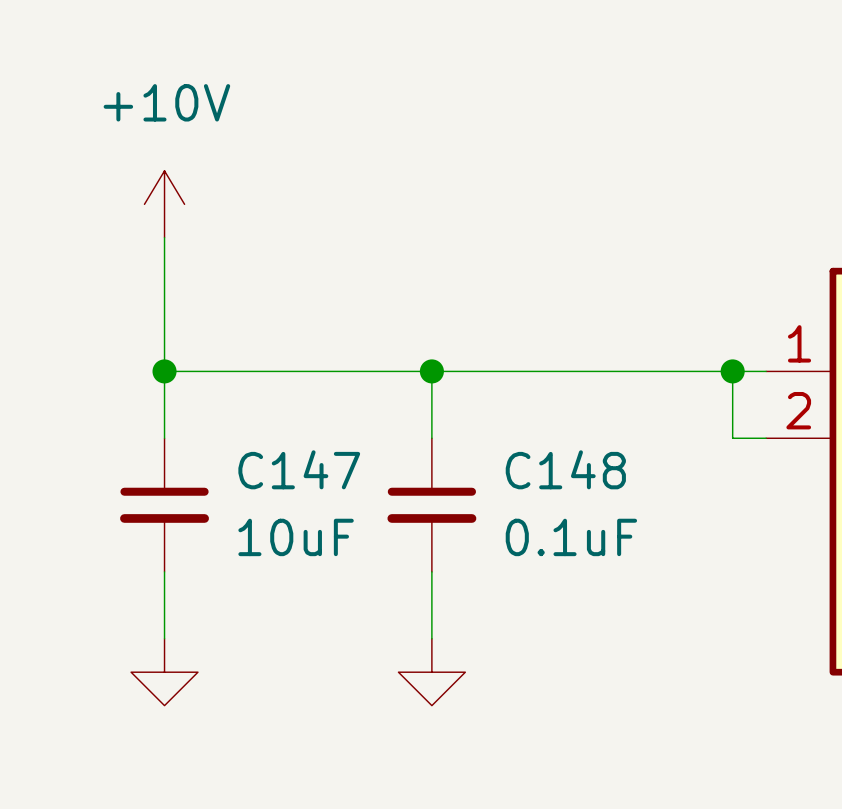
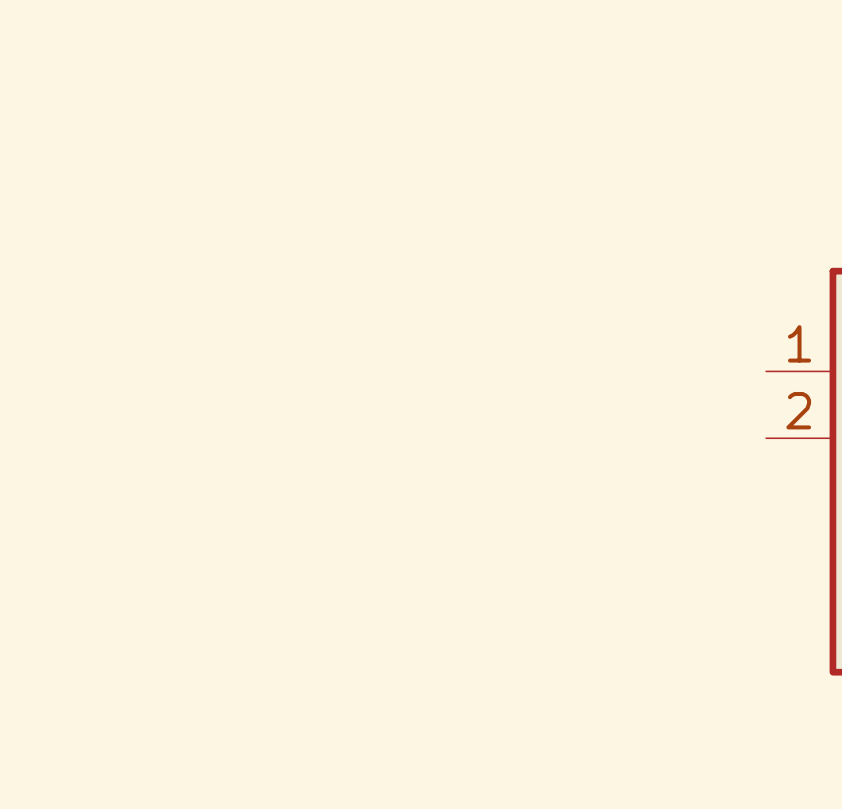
power symbol: +10V (164, 204) -> none
wire: (164, 237) (164, 438) -> none
wire: (164, 371) (766, 371) -> none
junction: (164, 371) -> none
wire: (431, 371) (431, 438) -> none
junction: (431, 371) -> none
wire: (732, 371) (732, 438) (766, 438) -> none
junction: (732, 371) -> none
C147: 10uF (164, 505) -> none
C148: 0.1uF (431, 505) -> none
wire: (164, 571) (164, 638) -> none
wire: (431, 571) (431, 638) -> none
power symbol: (164, 672) -> none
power symbol: (431, 672) -> none

